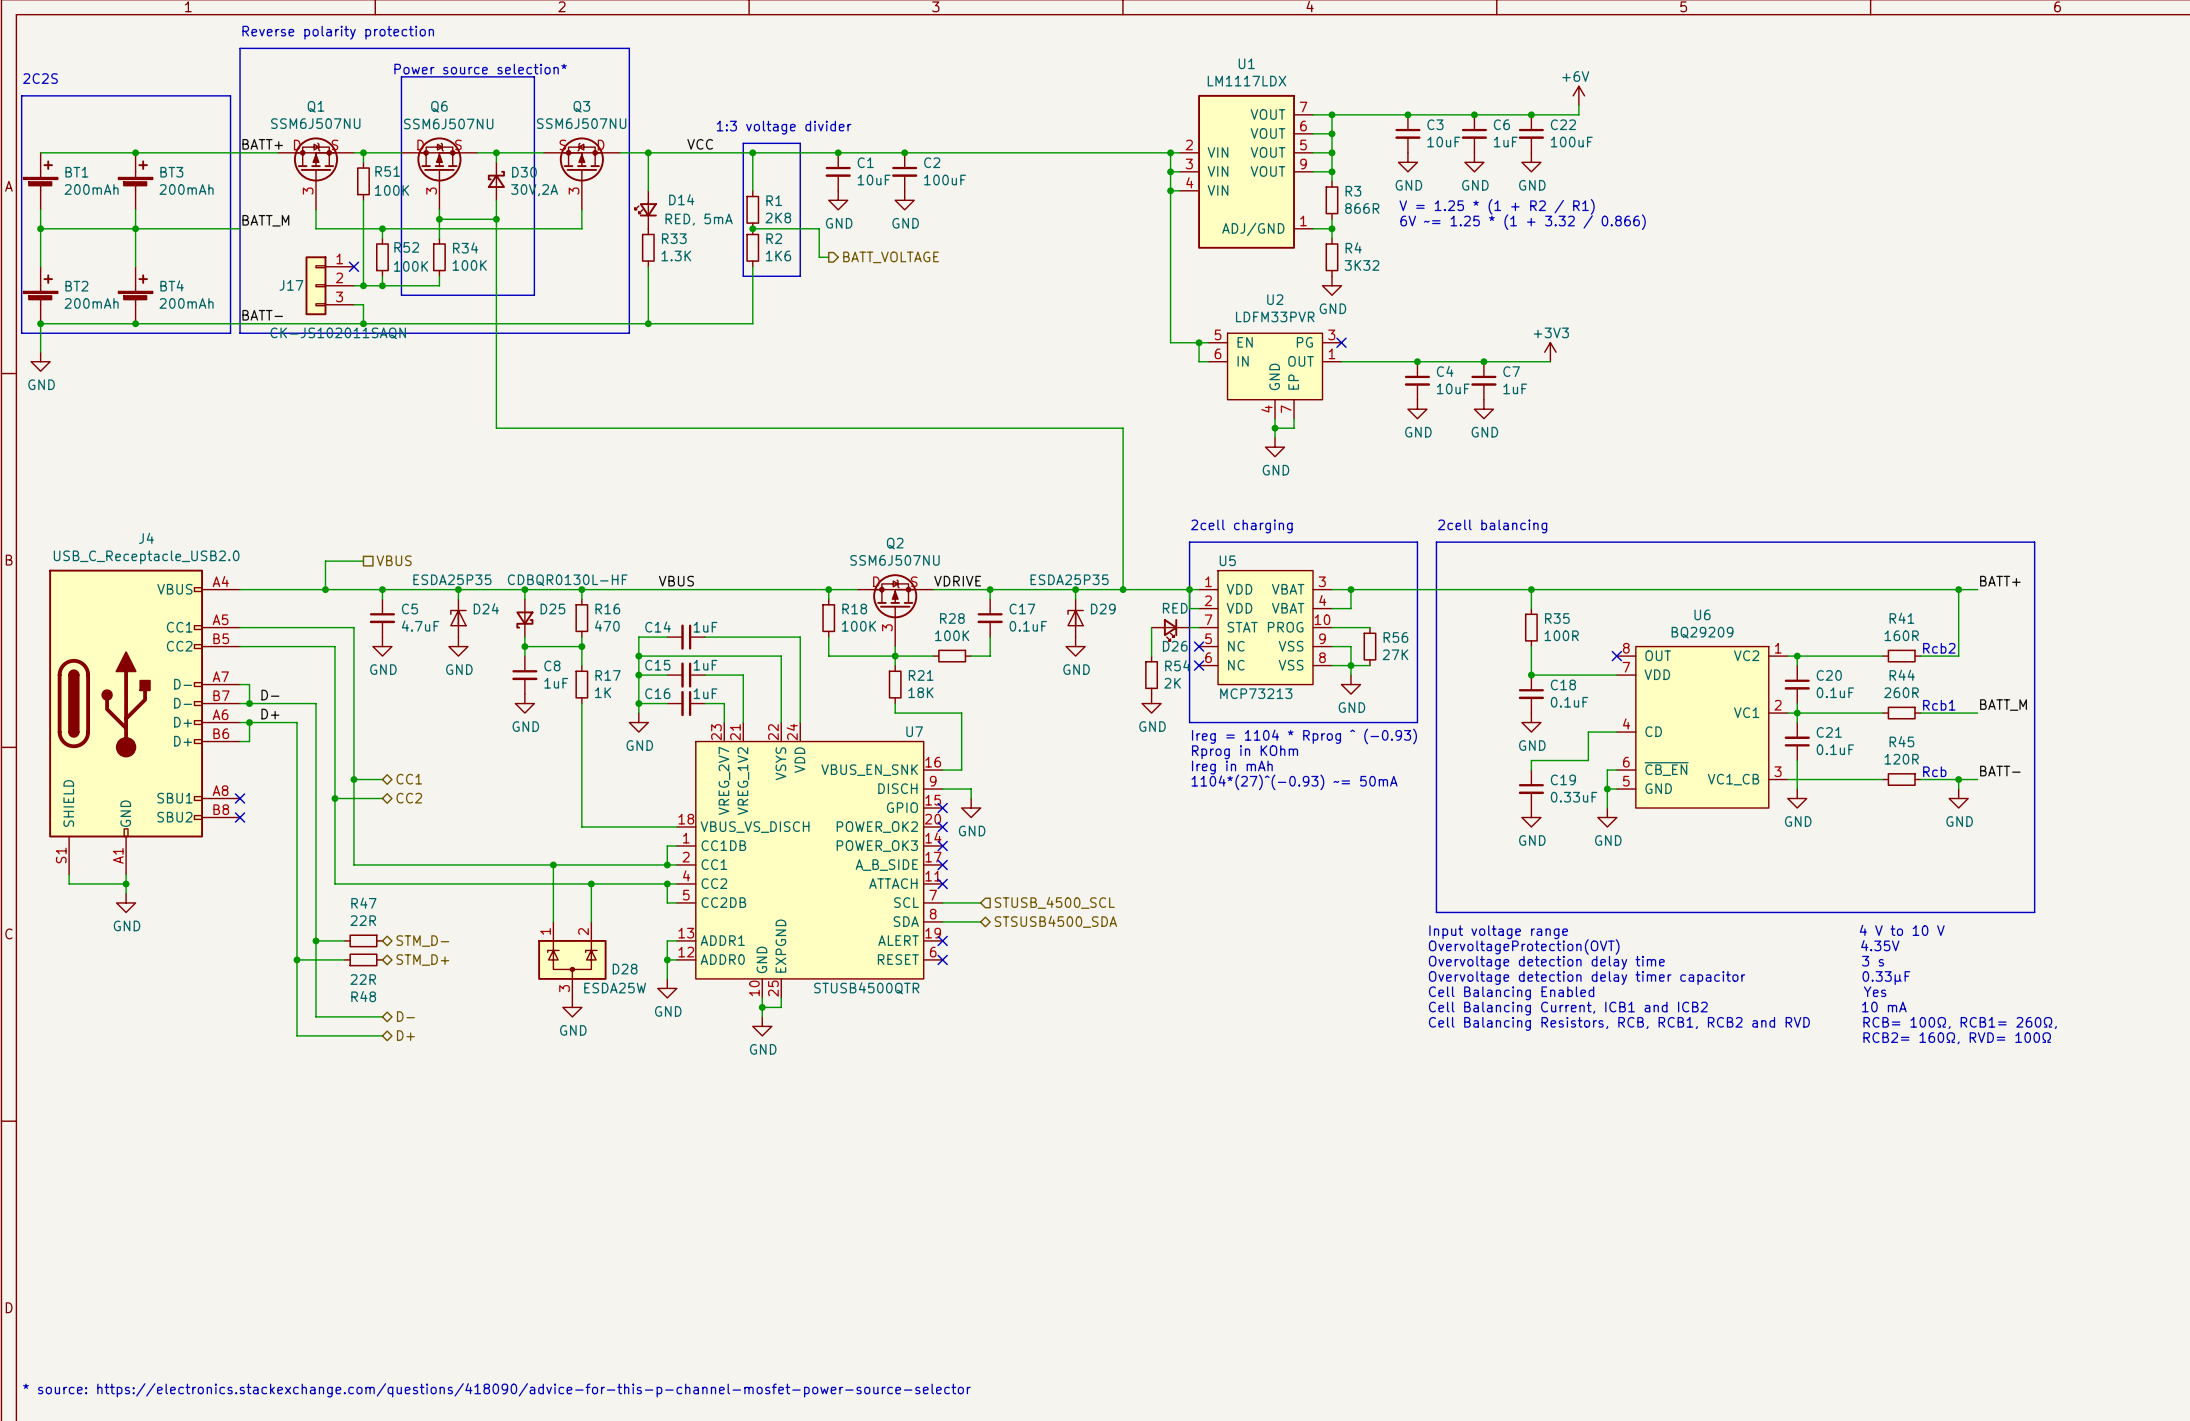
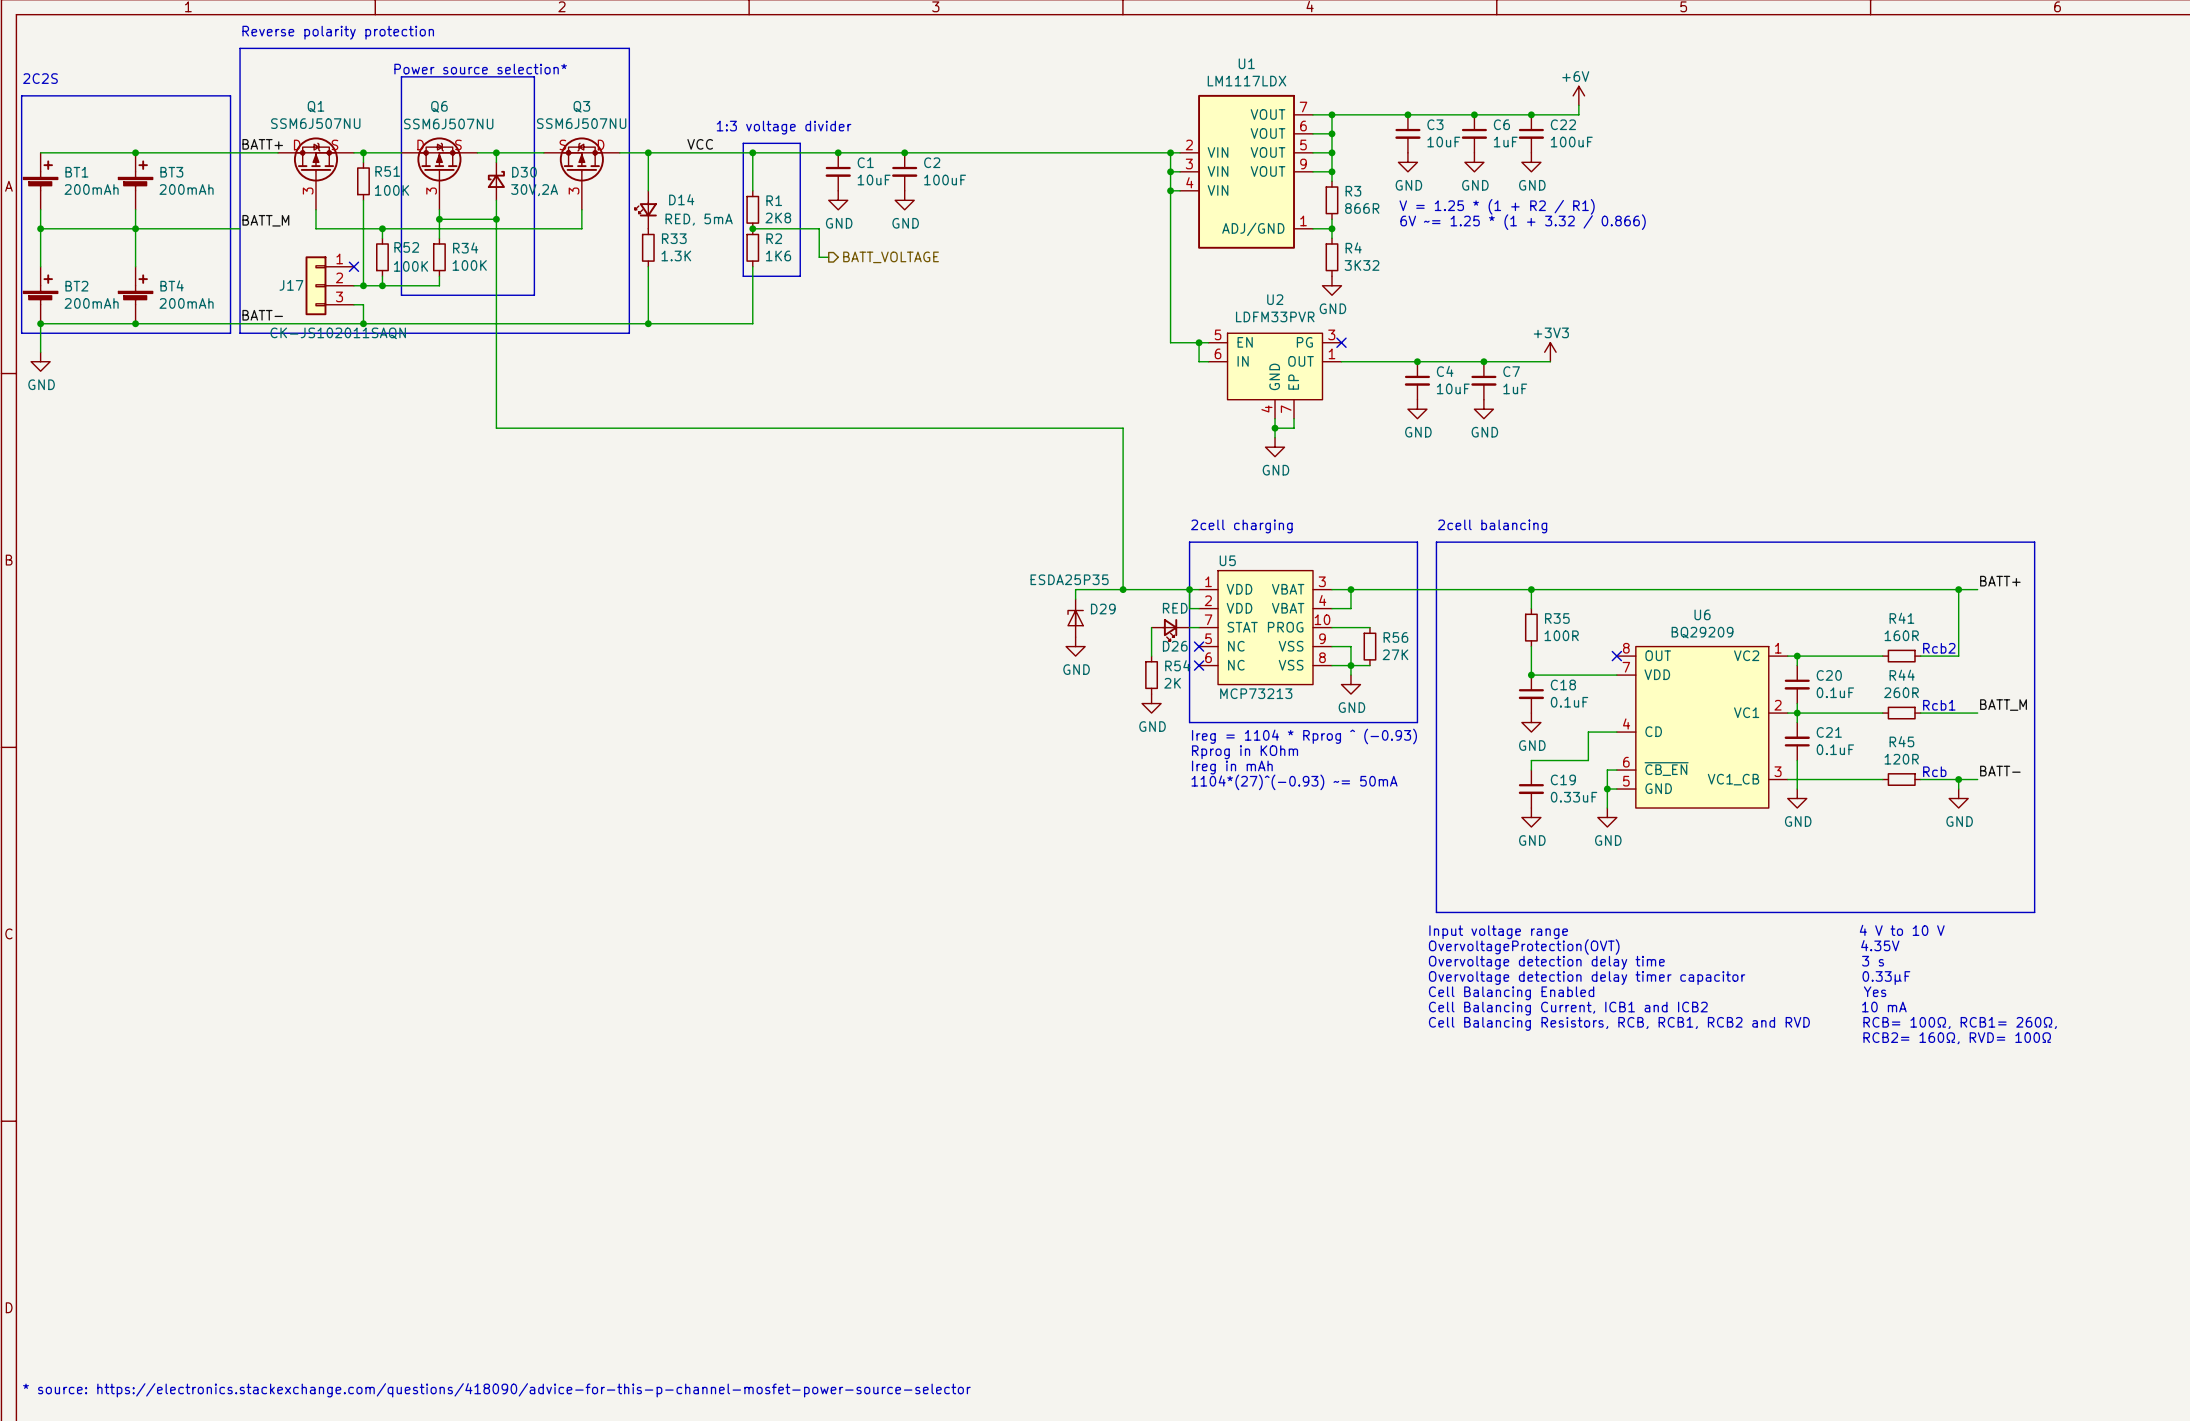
hierarchical label: VBUS (394, 560) -> none
wire: (363, 561) (325, 561) (325, 589) -> none
label: VBUS (676, 581) -> none
label: VDRIVE (957, 581) -> none
wire: (240, 589) (857, 589) -> none
junction: (325, 589) -> none
wire: (382, 589) (382, 599) -> none
junction: (382, 589) -> none
wire: (458, 589) (458, 599) -> none
junction: (458, 589) -> none
wire: (524, 589) (524, 599) -> none
junction: (524, 589) -> none
wire: (581, 589) (581, 599) -> none
junction: (581, 589) -> none
wire: (828, 589) (828, 599) -> none
junction: (828, 589) -> none
wire: (933, 589) (1075, 589) -> none
wire: (990, 589) (990, 599) -> none
junction: (990, 589) -> none
junction: (1075, 589) -> none
Q2: (895, 610) -> none
C5: 4.7uF (382, 618) -> none
D24: (458, 618) -> none
D25: CDBQR0130L-HF (524, 618) -> none
R16: 470 (581, 618) -> none
R18: 100K (828, 618) -> none
C17: 0.1uF (990, 618) -> none
wire: (240, 627) (353, 627) (353, 864) (676, 864) -> none
wire: (524, 637) (524, 656) -> none
wire: (581, 637) (581, 665) -> none
wire: (667, 637) (638, 637) (638, 713) -> none
C14: 1uF (686, 637) -> none
wire: (705, 637) (800, 637) (800, 722) -> none
wire: (828, 637) (828, 656) (933, 656) -> none
wire: (990, 637) (990, 656) (971, 656) -> none
wire: (240, 646) (334, 646) (334, 883) (676, 883) -> none
power symbol: GND (382, 646) -> none
power symbol: GND (458, 646) -> none
wire: (524, 646) (581, 646) -> none
junction: (524, 646) -> none
junction: (581, 646) -> none
wire: (895, 646) (895, 665) -> none
wire: (638, 656) (781, 656) (781, 722) -> none
junction: (638, 656) -> none
junction: (895, 656) -> none
R28: 100K (952, 656) -> none
C8: 1uF (524, 675) -> none
wire: (638, 675) (667, 675) -> none
junction: (638, 675) -> none
C15: 1uF (686, 675) -> none
wire: (705, 675) (743, 675) (743, 722) -> none
wire: (240, 684) (249, 684) (249, 703) -> none
R17: 1K (581, 684) -> none
R21: 18K (895, 684) -> none
label: D- (270, 695) -> none
wire: (240, 703) (315, 703) (315, 1016) (382, 1016) -> none
junction: (249, 703) -> none
power symbol: GND (524, 703) -> none
wire: (581, 703) (581, 827) (676, 827) -> none
wire: (638, 703) (667, 703) -> none
junction: (638, 703) -> none
C16: 1uF (686, 703) -> none
wire: (705, 703) (724, 703) (724, 722) -> none
wire: (895, 703) (895, 713) (961, 713) (961, 770) (942, 770) -> none
label: D+ (270, 714) -> none
J4: USB_C_Receptacle_USB2.0 (144, 722) -> none
wire: (240, 722) (297, 722) (297, 1035) (382, 1035) -> none
wire: (249, 722) (249, 741) (240, 741) -> none
junction: (249, 722) -> none
power symbol: GND (638, 722) -> none
wire: (353, 779) (382, 779) -> none
junction: (353, 779) -> none
hierarchical label: CC1 (409, 779) -> none
wire: (942, 789) (971, 789) (971, 798) -> none
no-connect mark: (240, 798) -> none
wire: (334, 798) (382, 798) -> none
junction: (334, 798) -> none
hierarchical label: CC2 (409, 798) -> none
no-connect mark: (942, 808) -> none
power symbol: GND (971, 808) -> none
no-connect mark: (240, 817) -> none
no-connect mark: (942, 827) -> none
wire: (676, 845) (667, 845) (667, 864) -> none
no-connect mark: (942, 845) -> none
U7: STUSB4500QTR (809, 860) -> none
wire: (553, 864) (553, 921) -> none
junction: (553, 864) -> none
junction: (667, 864) -> none
no-connect mark: (942, 864) -> none
wire: (69, 874) (69, 883) (126, 883) -> none
wire: (126, 874) (126, 893) -> none
junction: (126, 883) -> none
wire: (591, 883) (591, 921) -> none
junction: (591, 883) -> none
wire: (667, 883) (667, 902) (676, 902) -> none
junction: (667, 883) -> none
no-connect mark: (942, 883) -> none
power symbol: GND (126, 902) -> none
wire: (942, 902) (980, 902) -> none
hierarchical label: STUSB_4500_SCL (1054, 902) -> none
wire: (942, 921) (980, 921) -> none
hierarchical label: STSUSB4500_SDA (1055, 921) -> none
wire: (315, 940) (344, 940) -> none
junction: (315, 940) -> none
R47: 22R (363, 940) -> none
wire: (676, 940) (667, 940) (667, 978) -> none
no-connect mark: (942, 940) -> none
hierarchical label: STM_D- (422, 941) -> none
wire: (297, 959) (344, 959) -> none
junction: (297, 959) -> none
R48: 22R (363, 959) -> none
D28: (572, 959) -> none
wire: (667, 959) (676, 959) -> none
junction: (667, 959) -> none
no-connect mark: (942, 959) -> none
hierarchical label: STM_D+ (422, 960) -> none
power symbol: GND (667, 988) -> none
wire: (762, 997) (762, 1016) -> none
wire: (781, 997) (781, 1007) (762, 1007) -> none
power symbol: GND (572, 1007) -> none
junction: (762, 1007) -> none
hierarchical label: D- (405, 1016) -> none
power symbol: GND (762, 1026) -> none
hierarchical label: D+ (405, 1035) -> none

